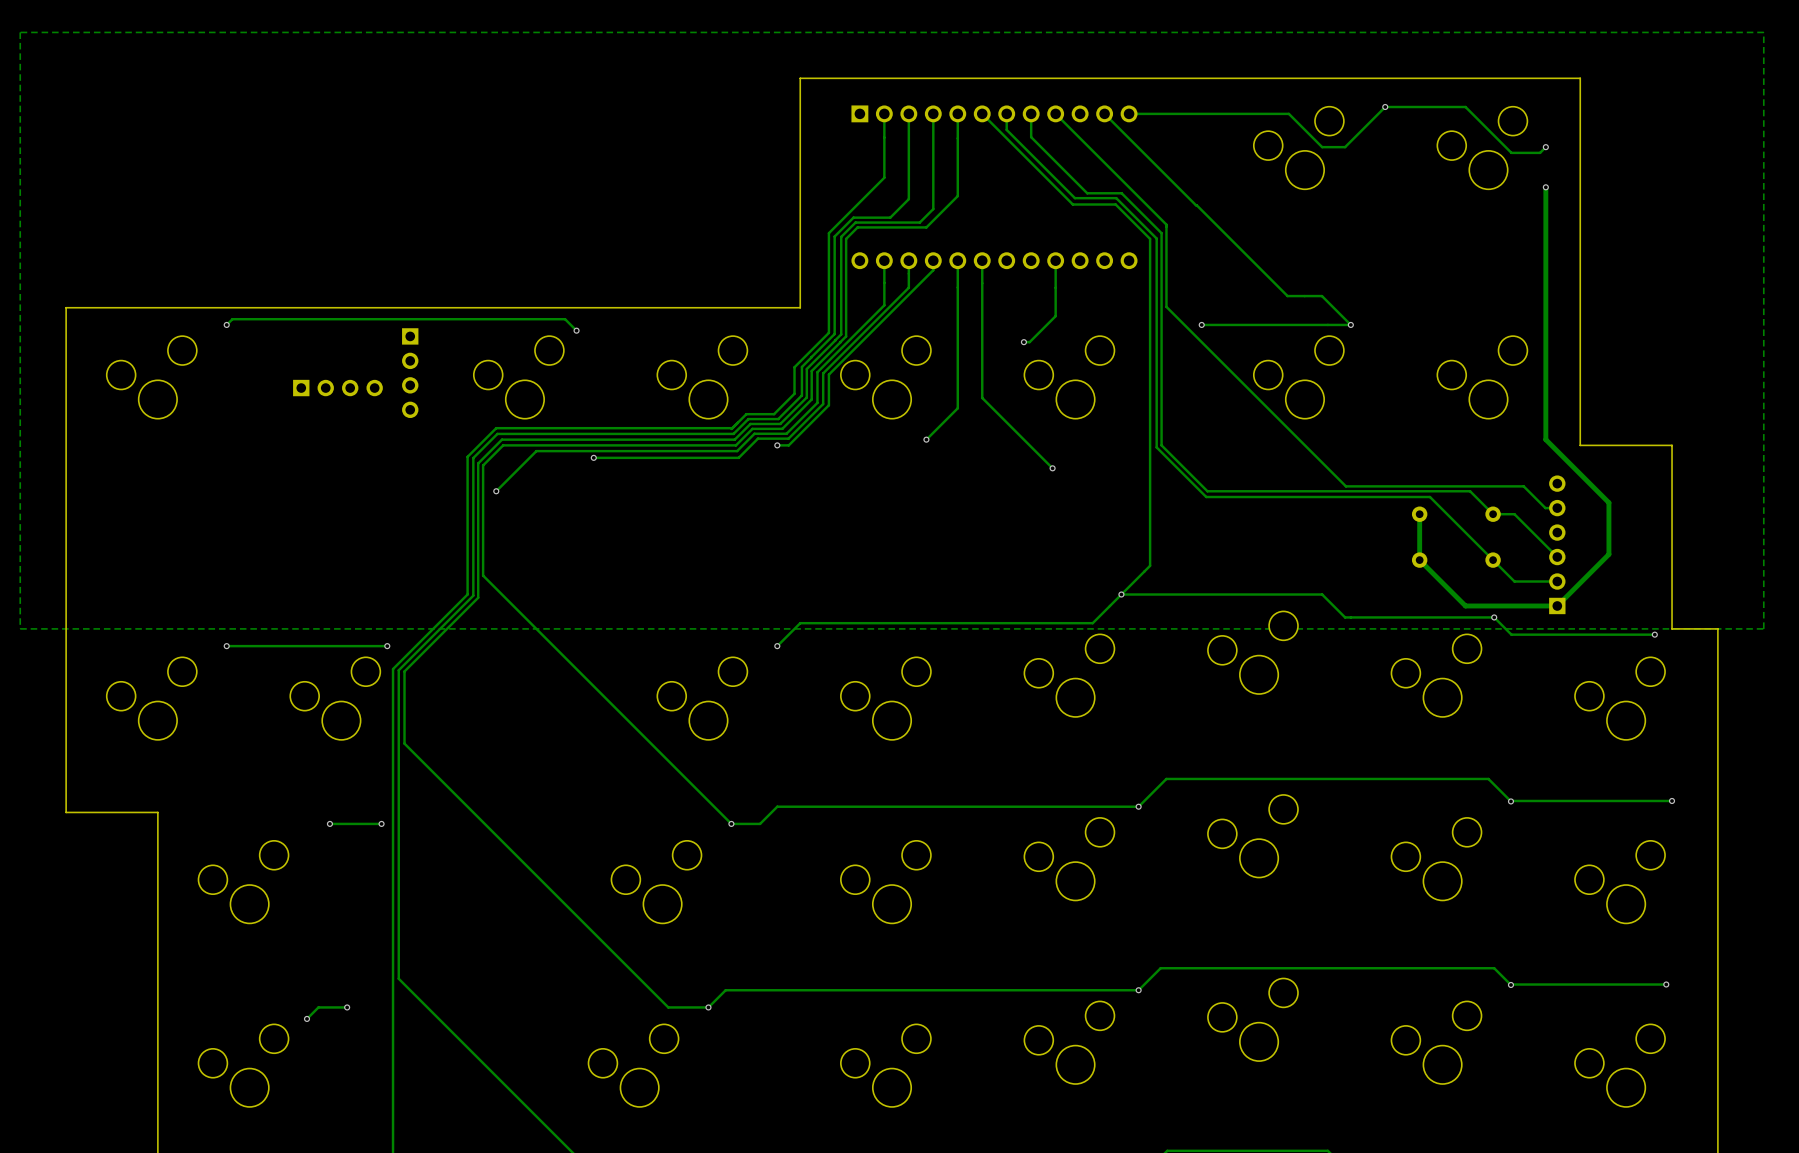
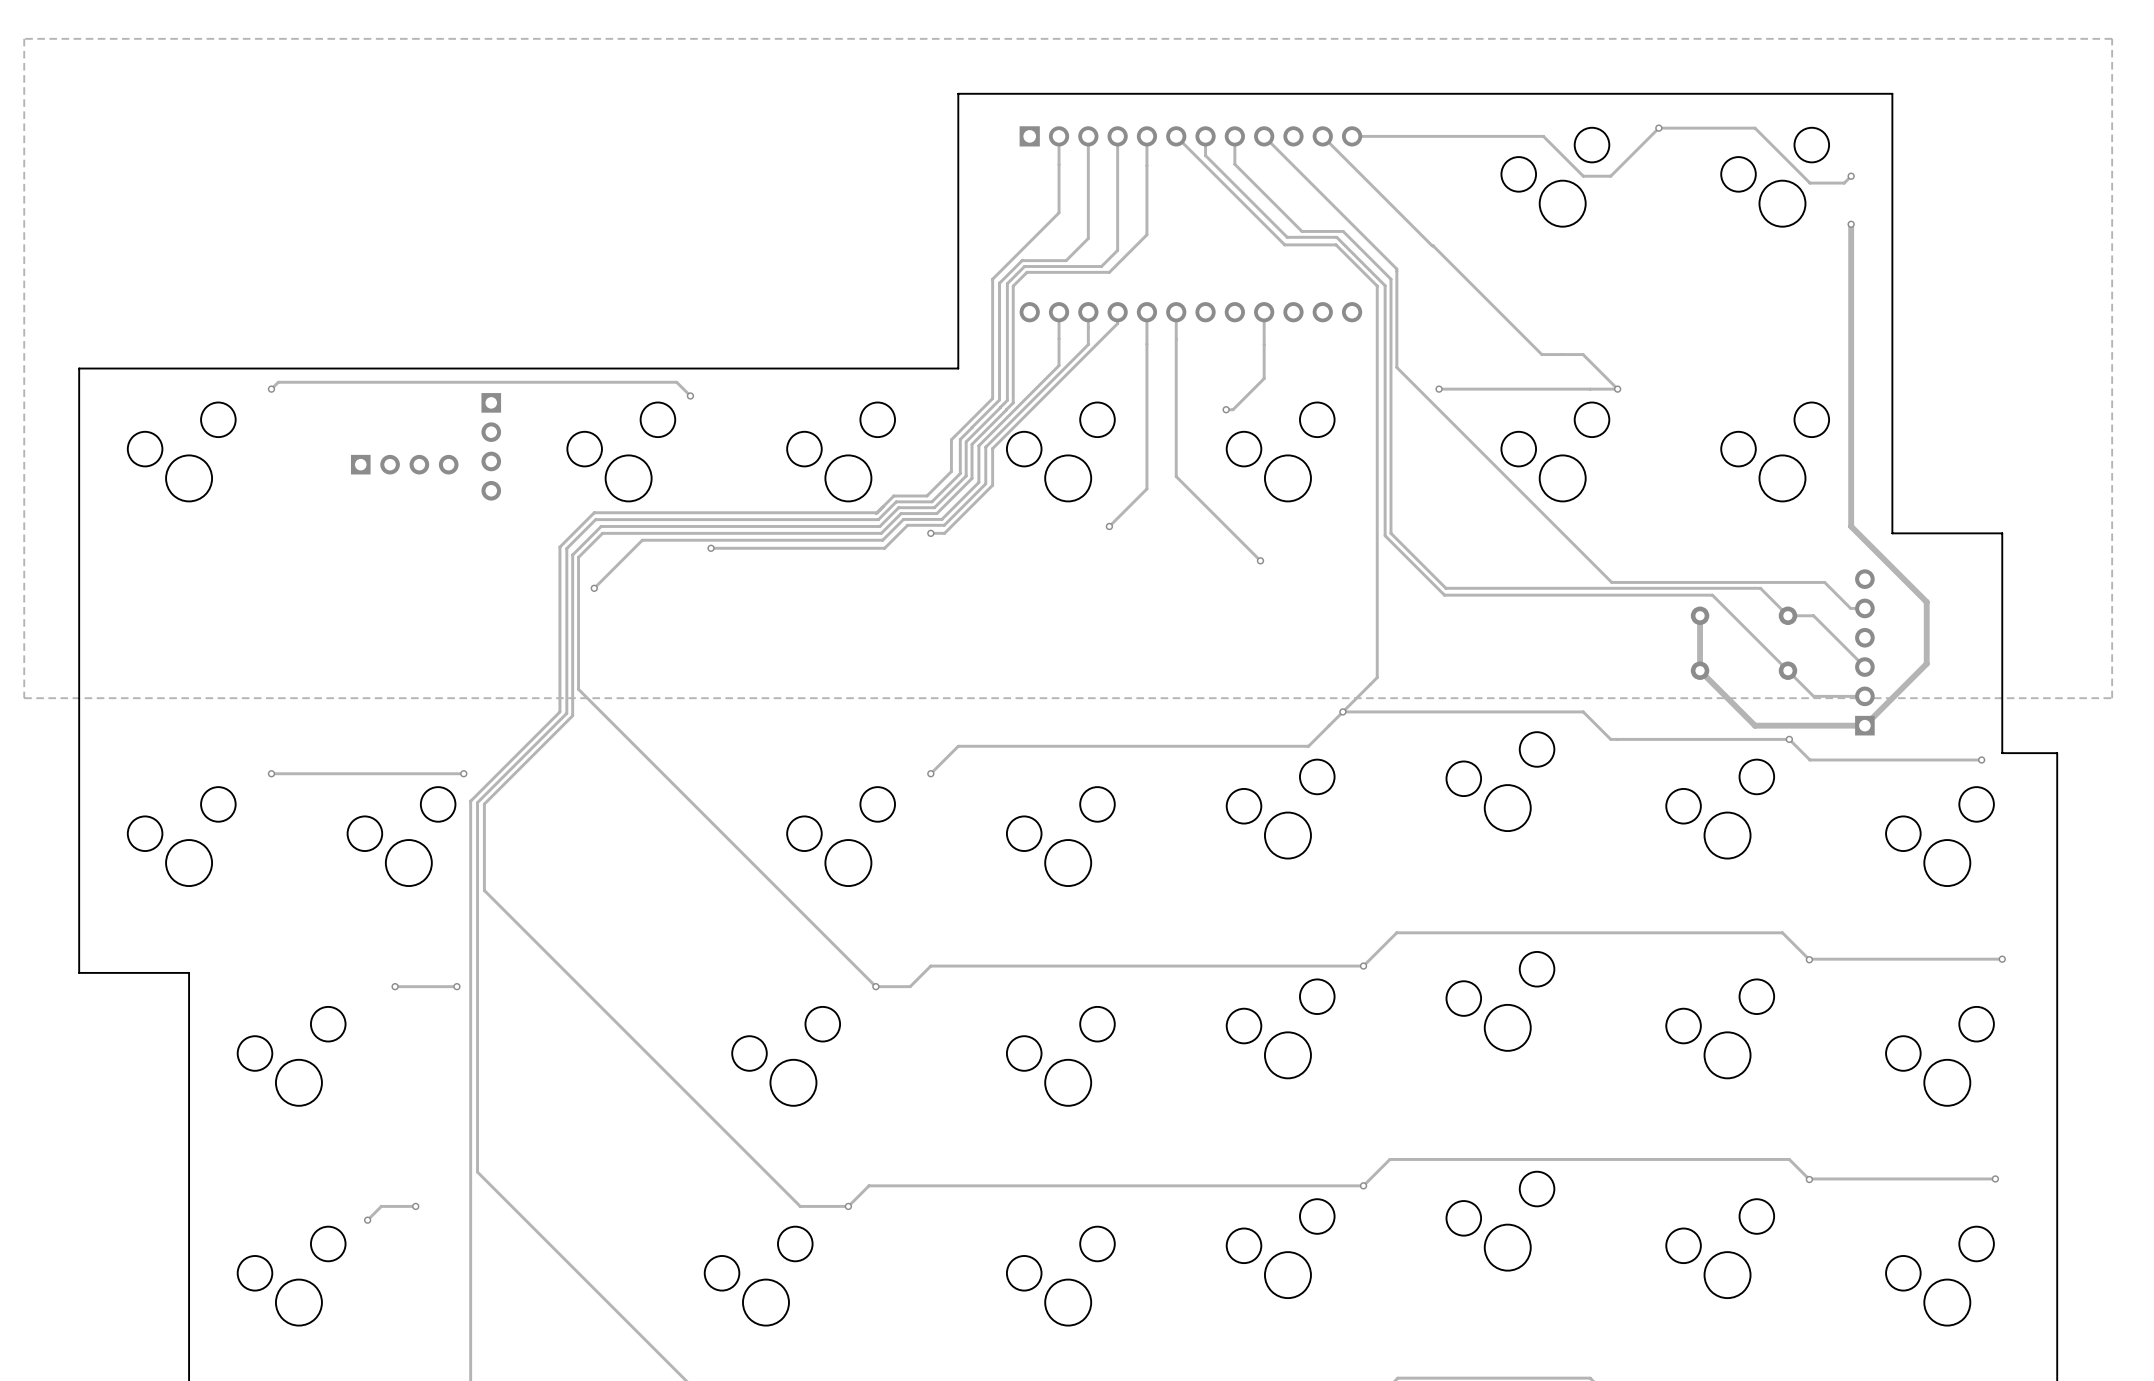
zone outline: (1763, 32) (1763, 628) (20, 628) (20, 583) -> (2112, 38) (2112, 698) (24, 698)

